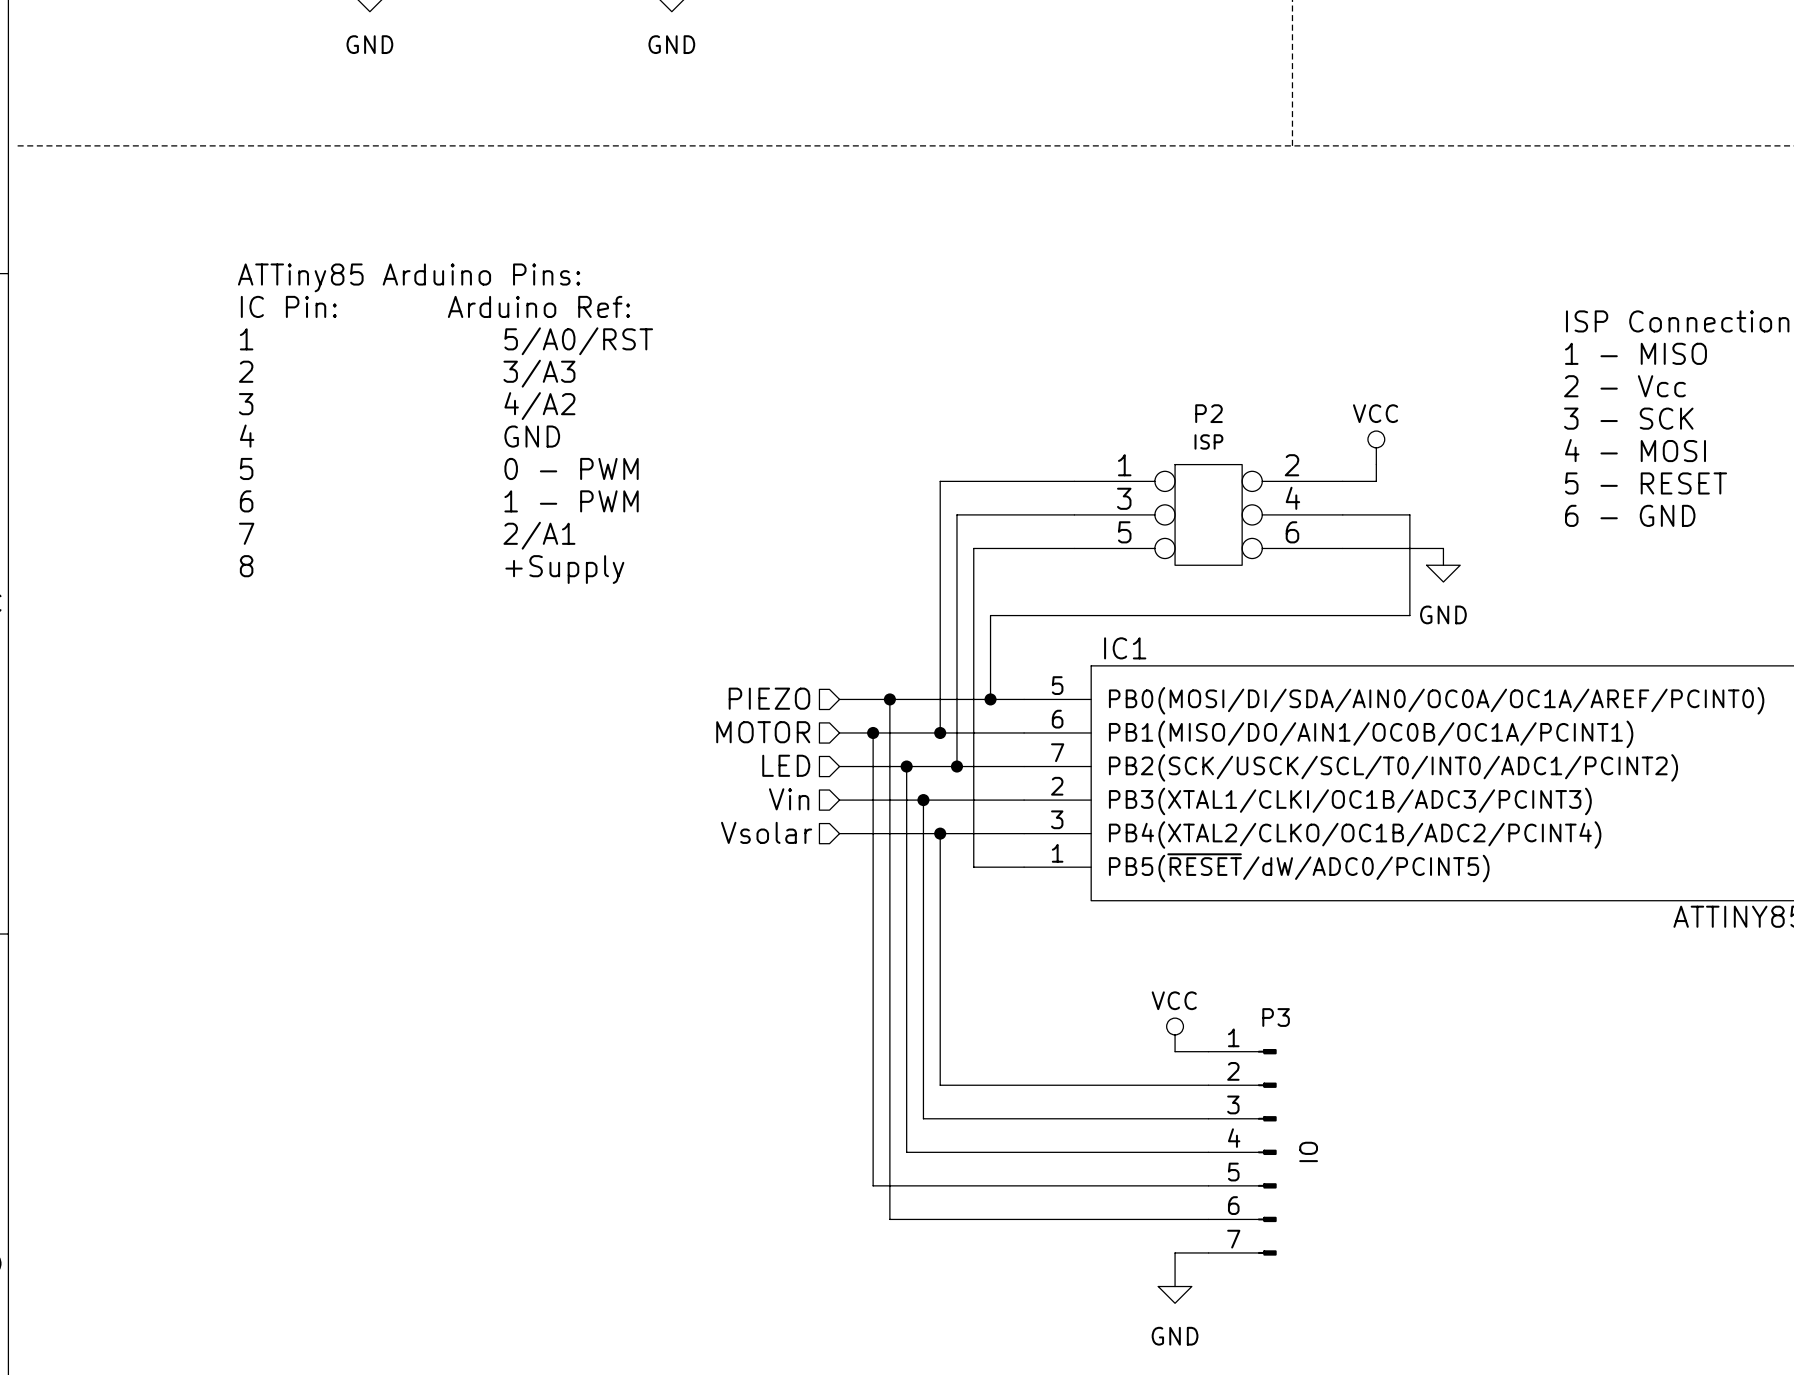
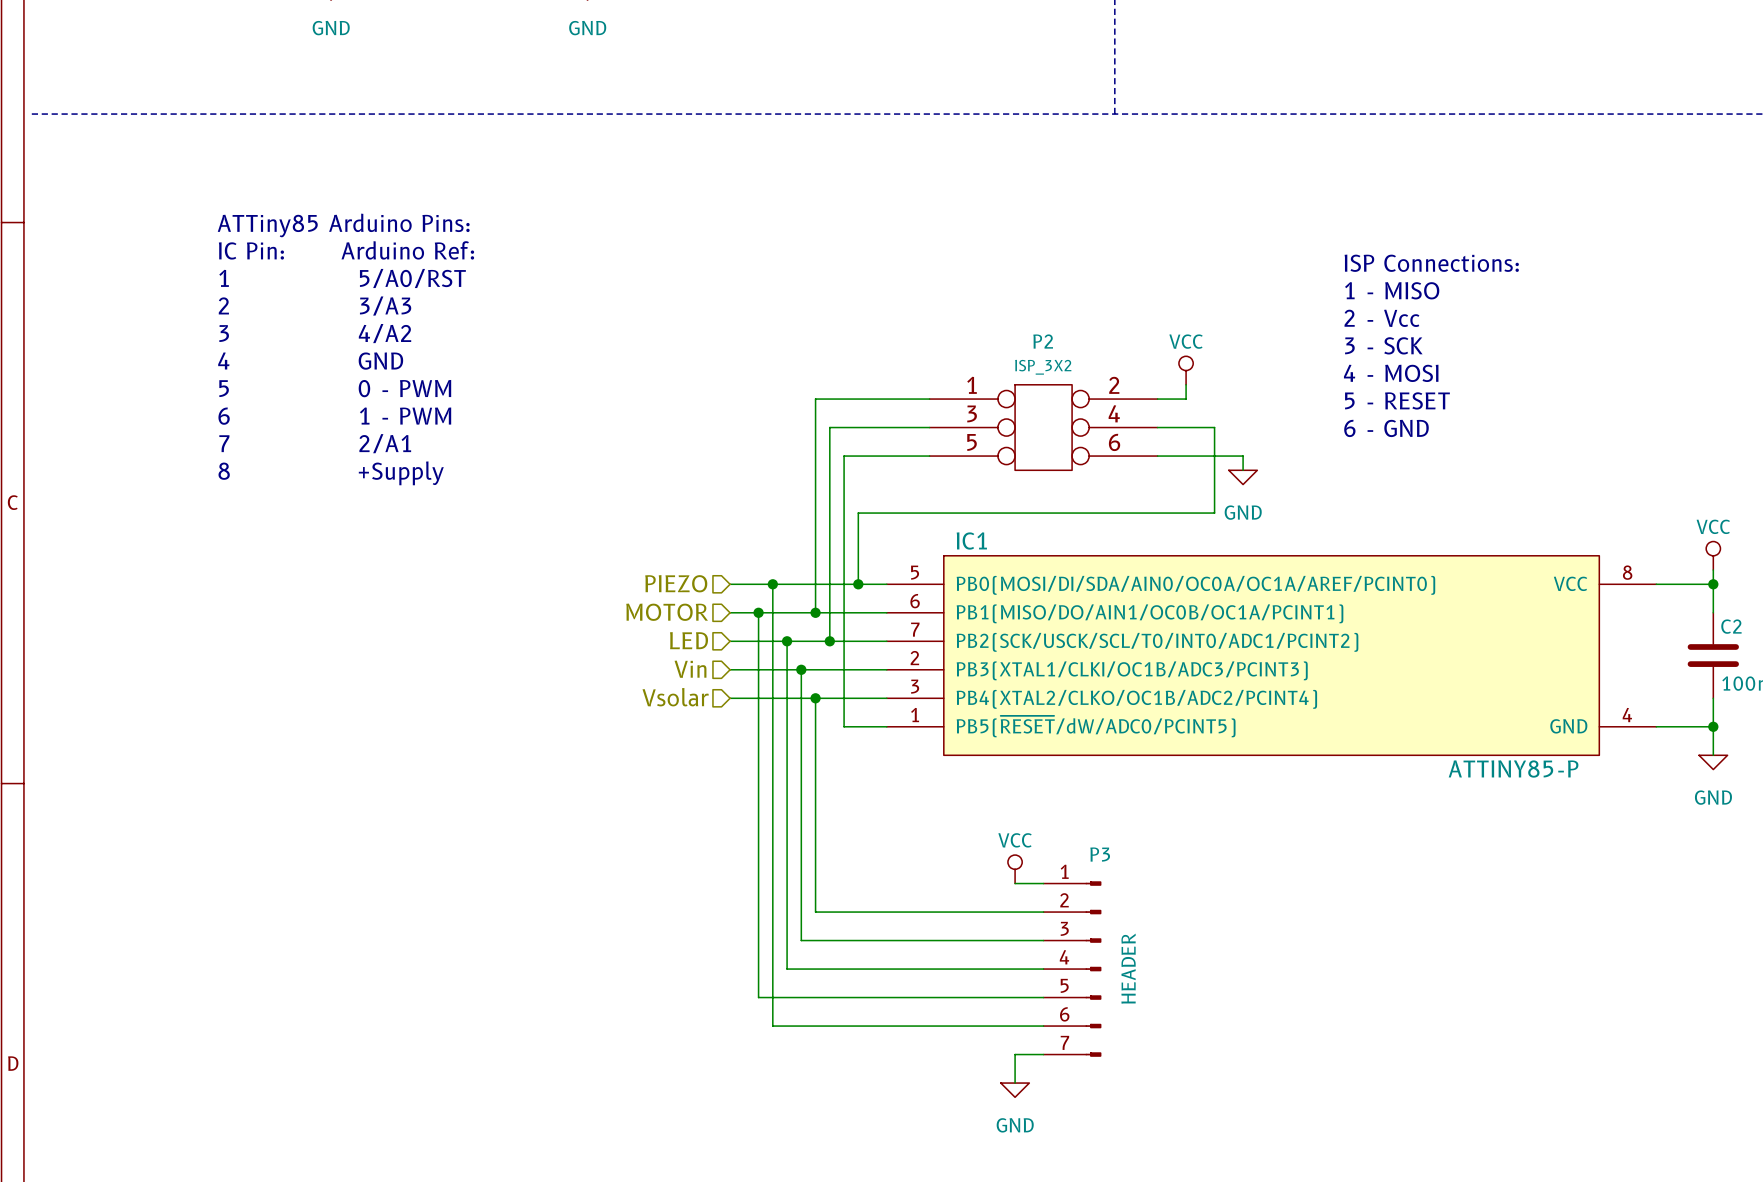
P2 value: ISP (1208, 441) -> ISP_3X2 (1043, 367)
P3 value: IO (1308, 1151) -> HEADER (1128, 968)

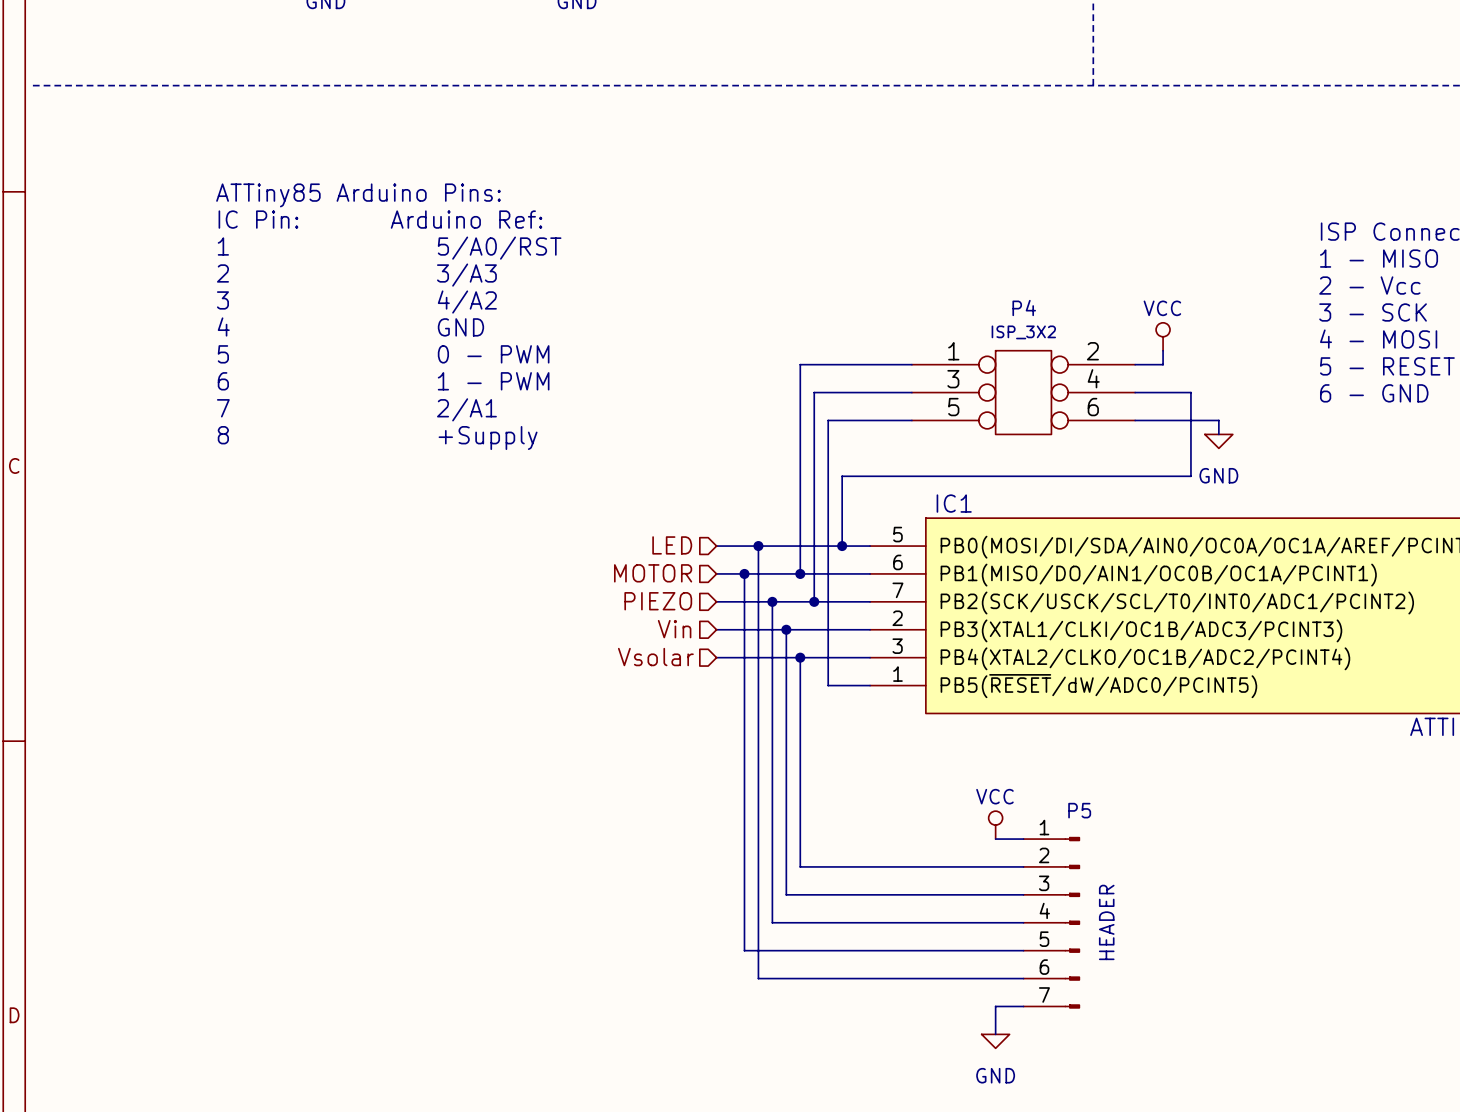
P2 name: P2 (1043, 341) -> P4 (1024, 308)
hierarchical label: PIEZO (676, 583) -> LED (672, 545)
hierarchical label: LED (689, 640) -> PIEZO (658, 601)
P3 name: P3 (1100, 854) -> P5 (1079, 810)

